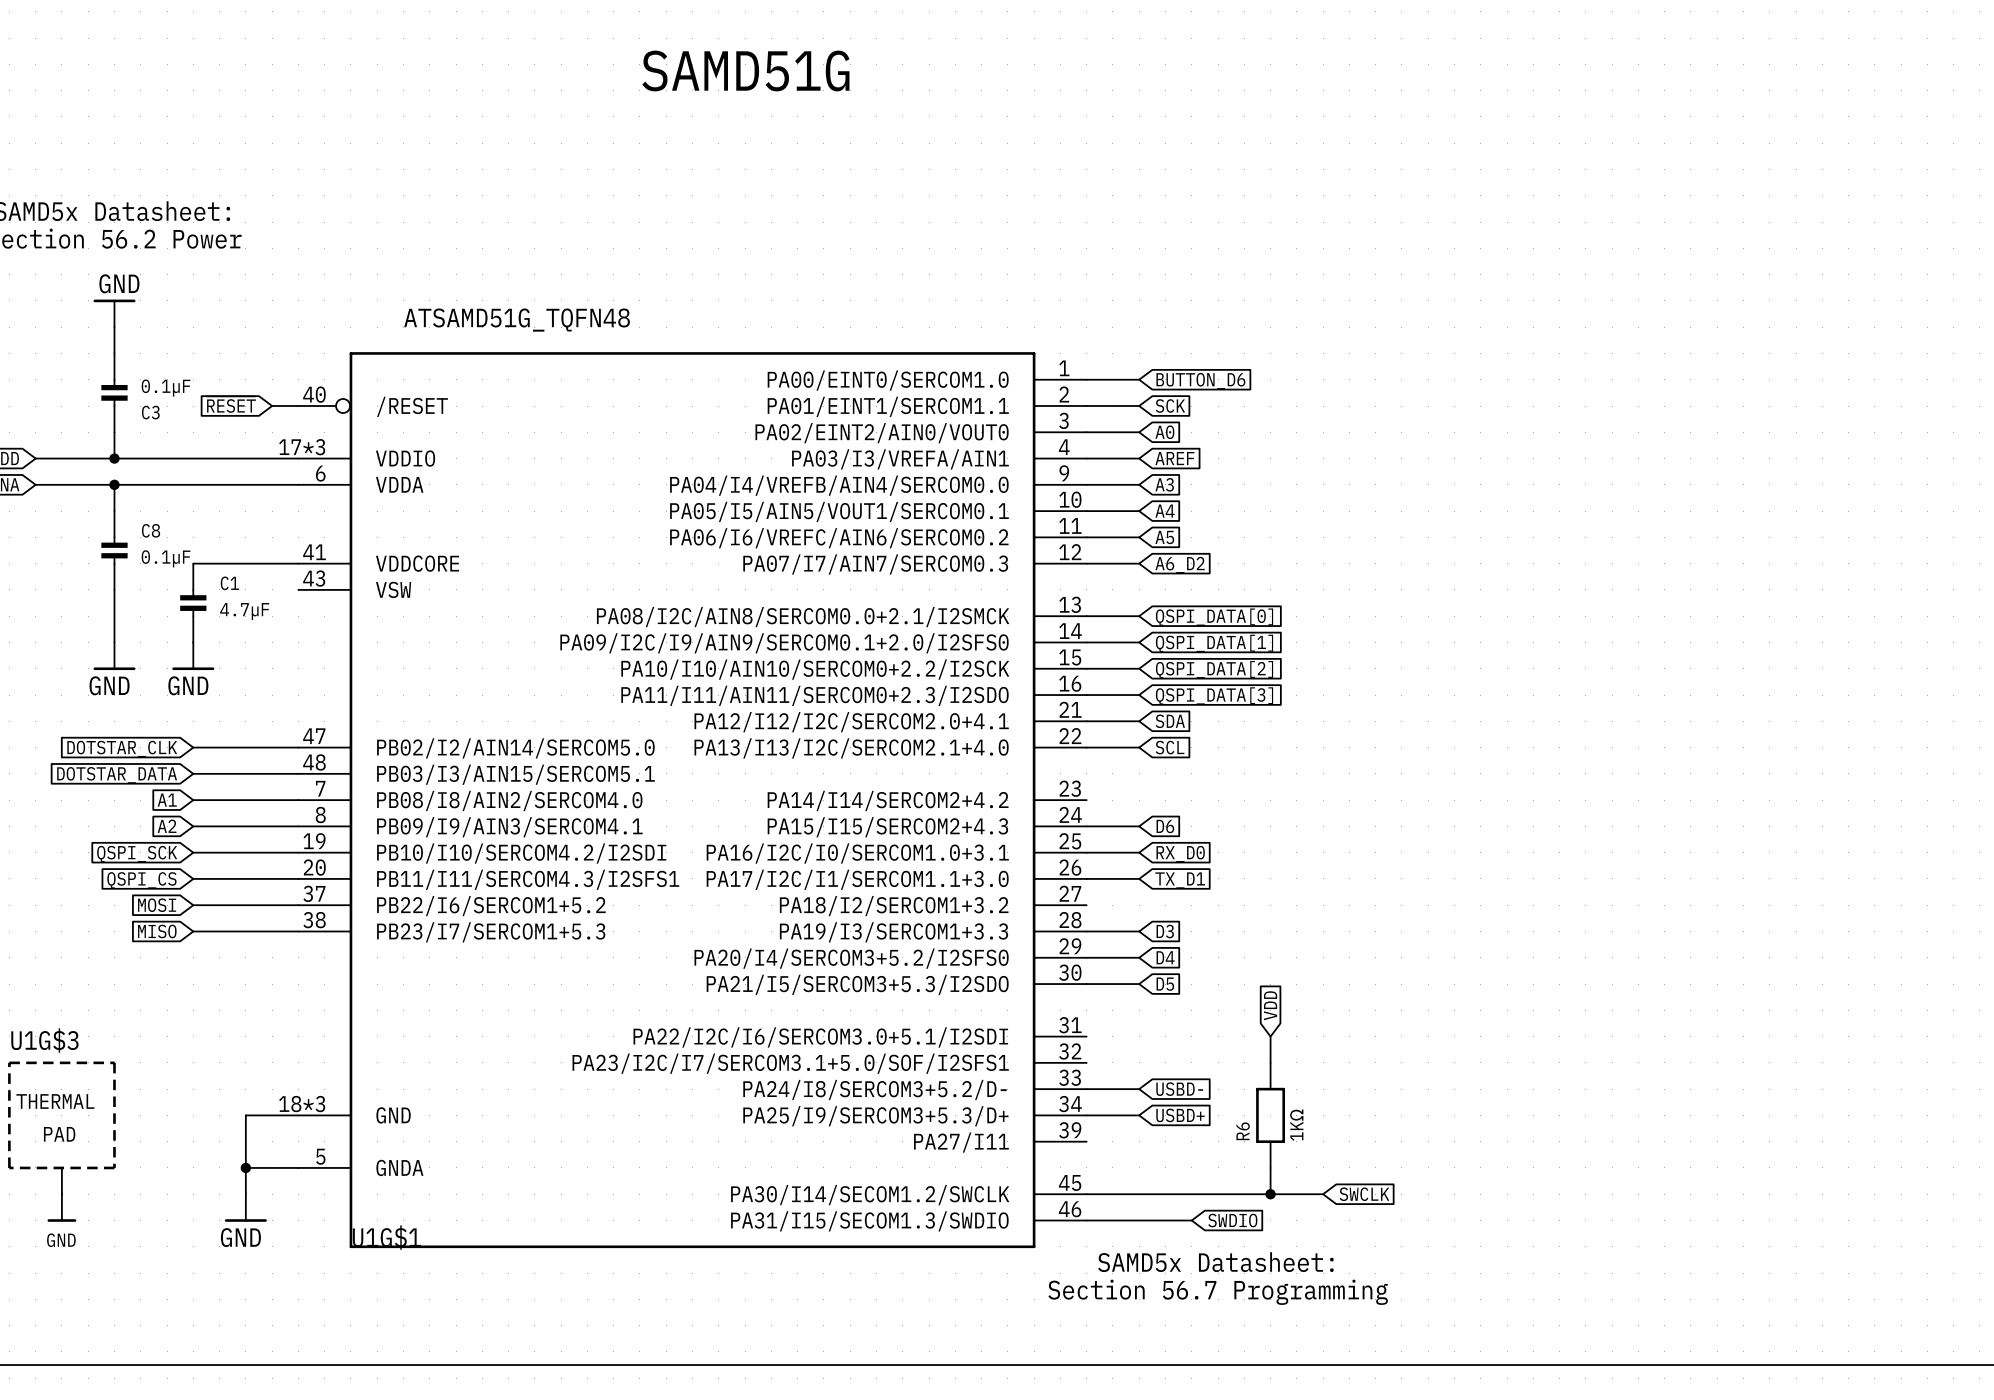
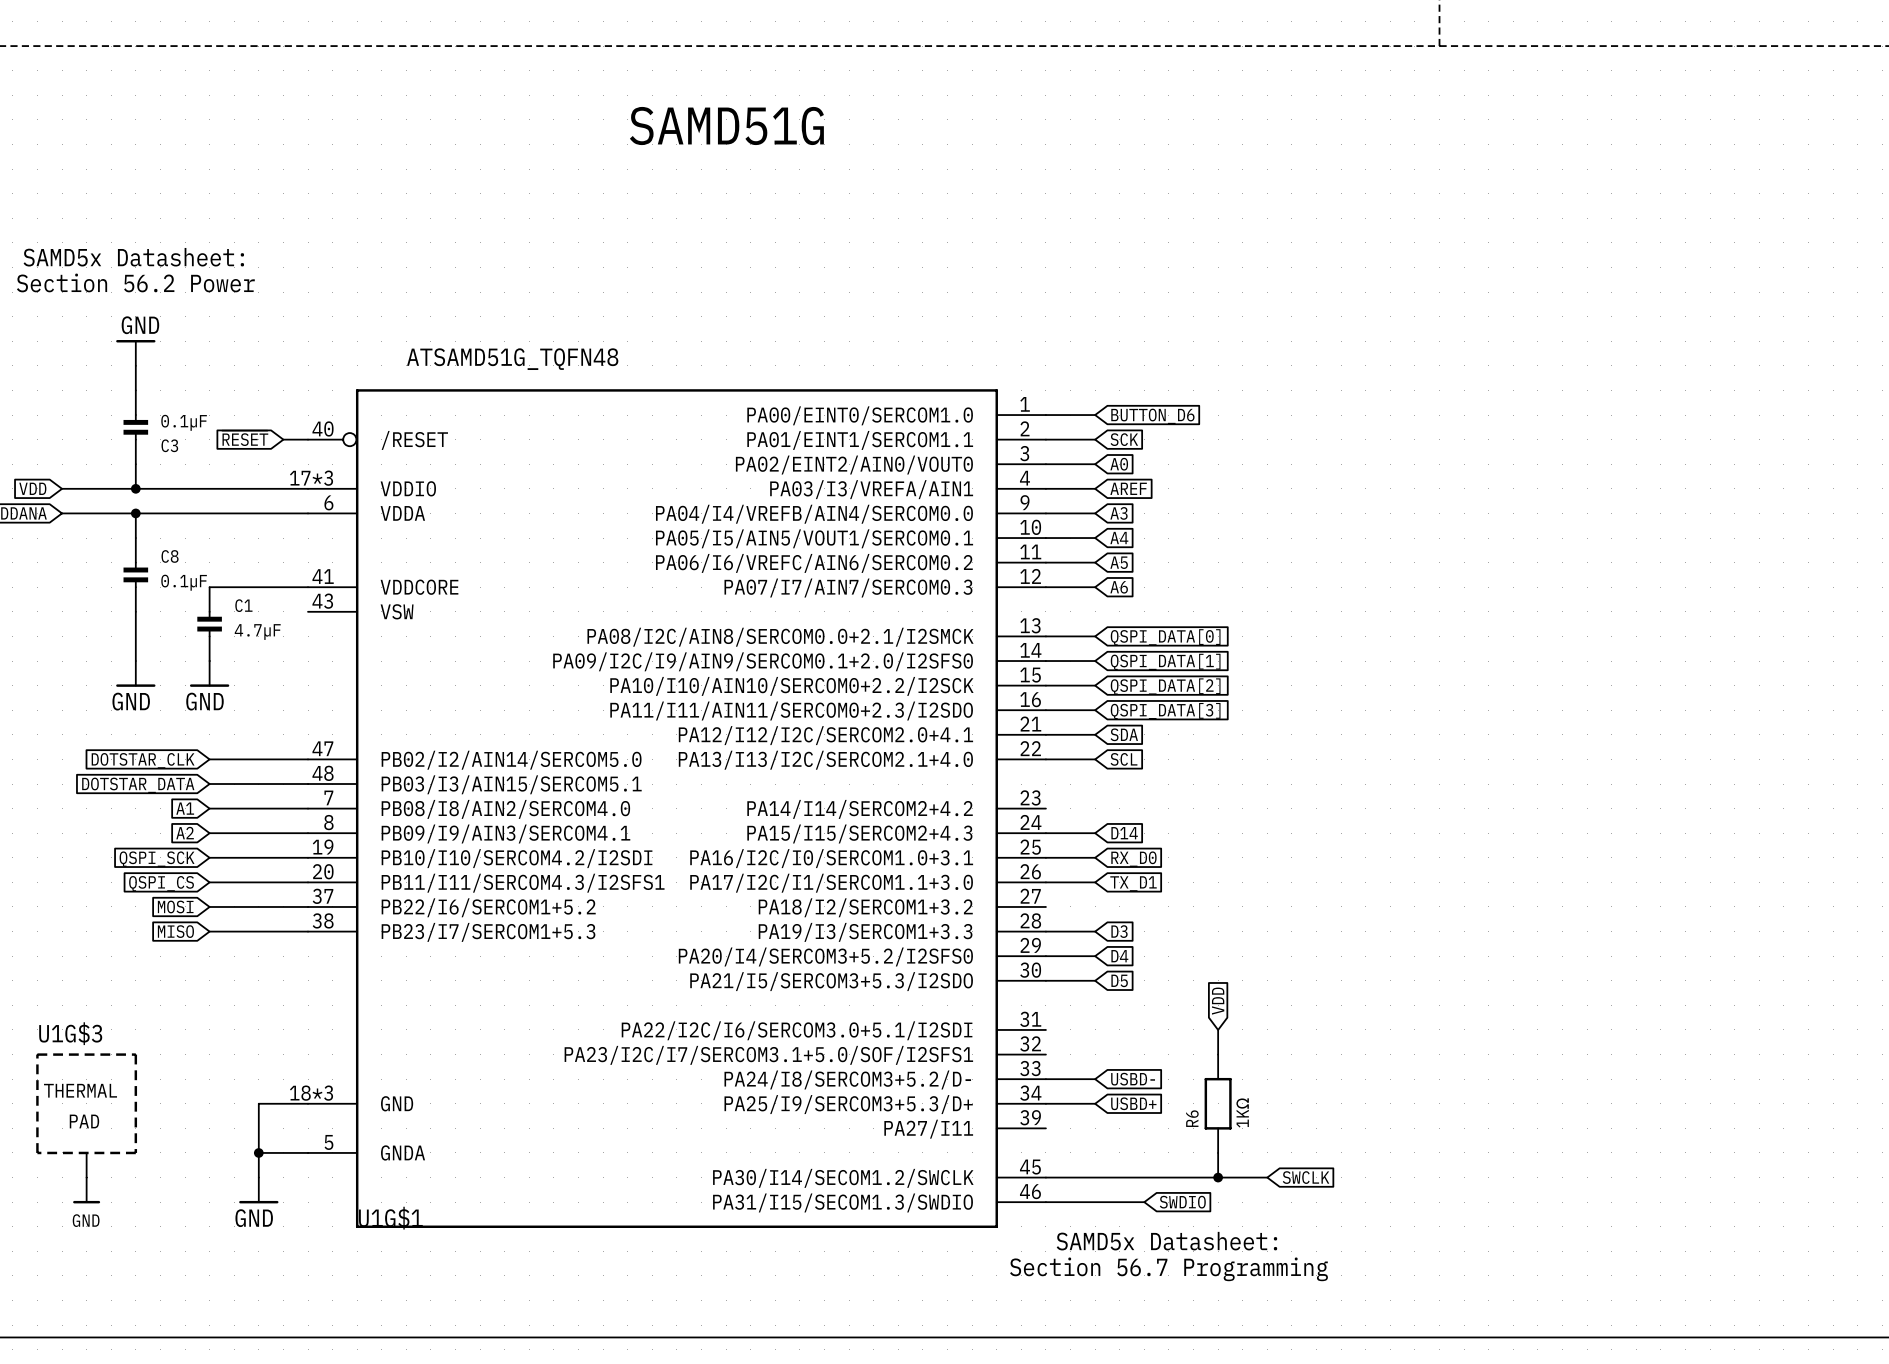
global label: A6_D2 (1180, 565) -> A6 (1119, 587)
global label: D6 (1165, 826) -> D14 (1124, 833)

